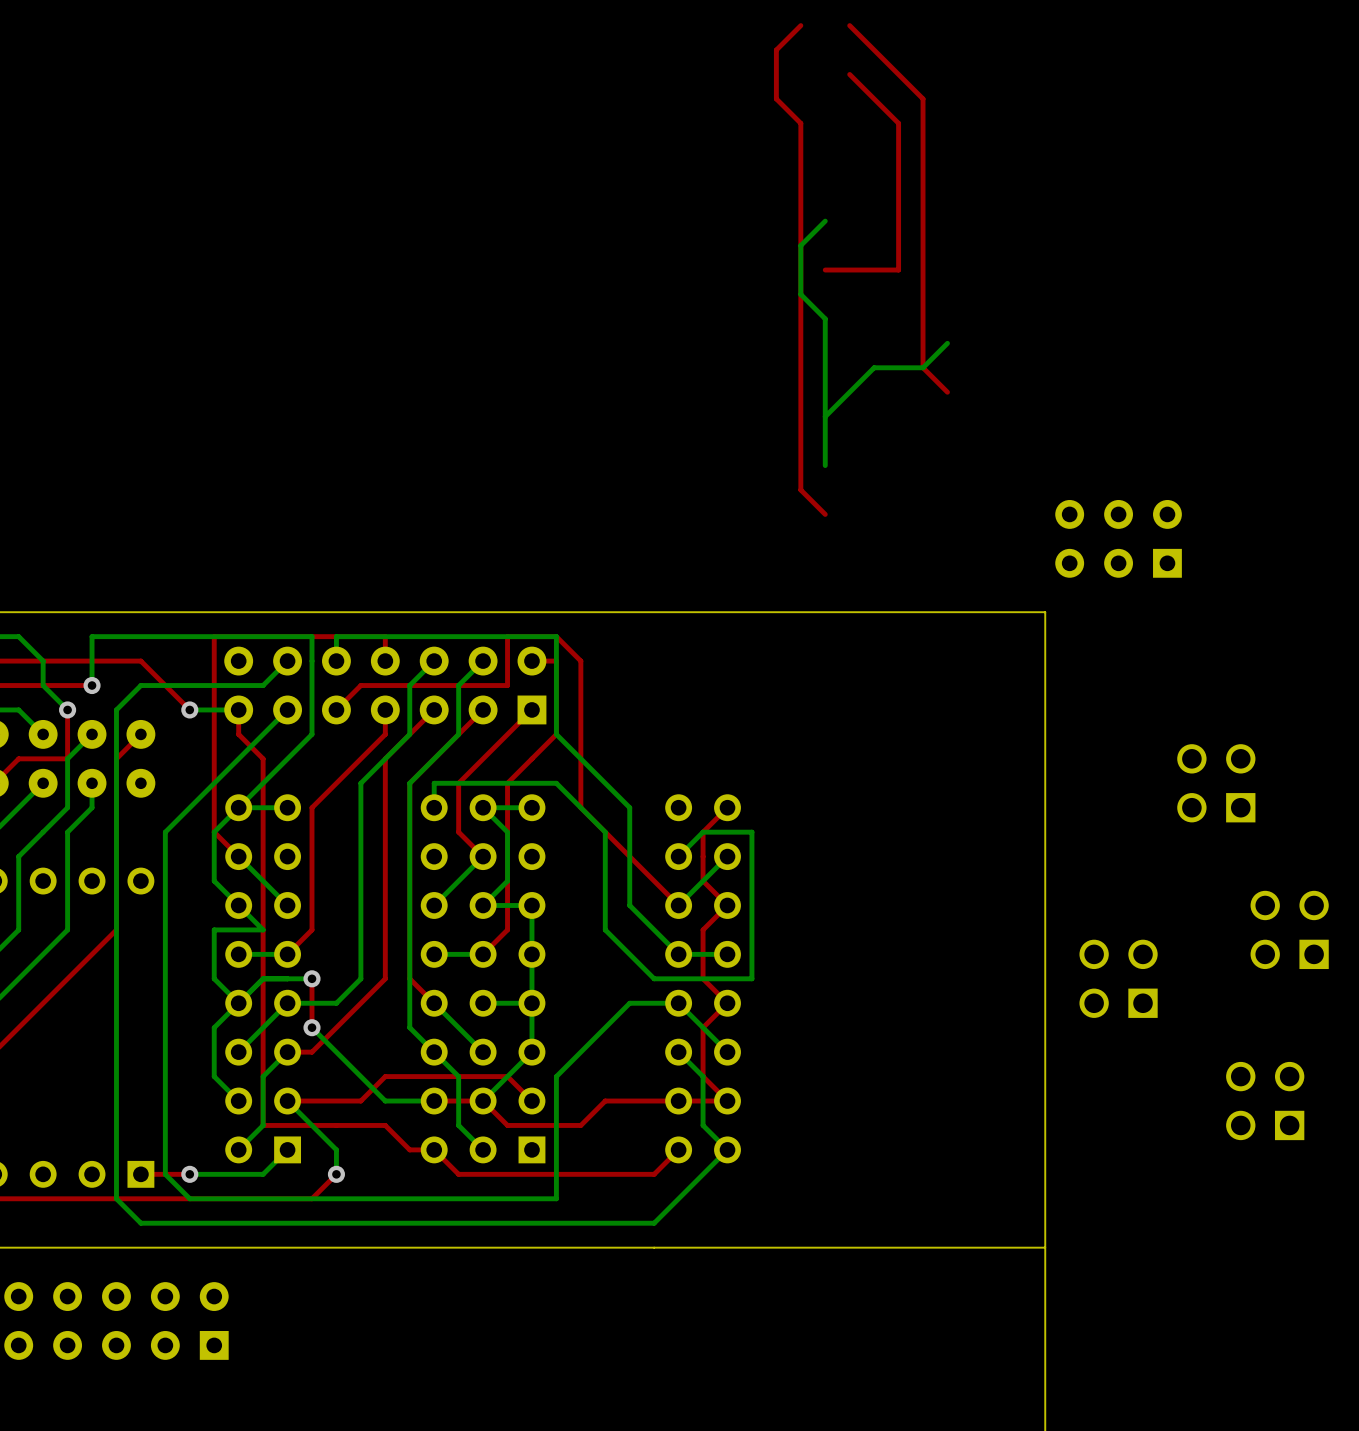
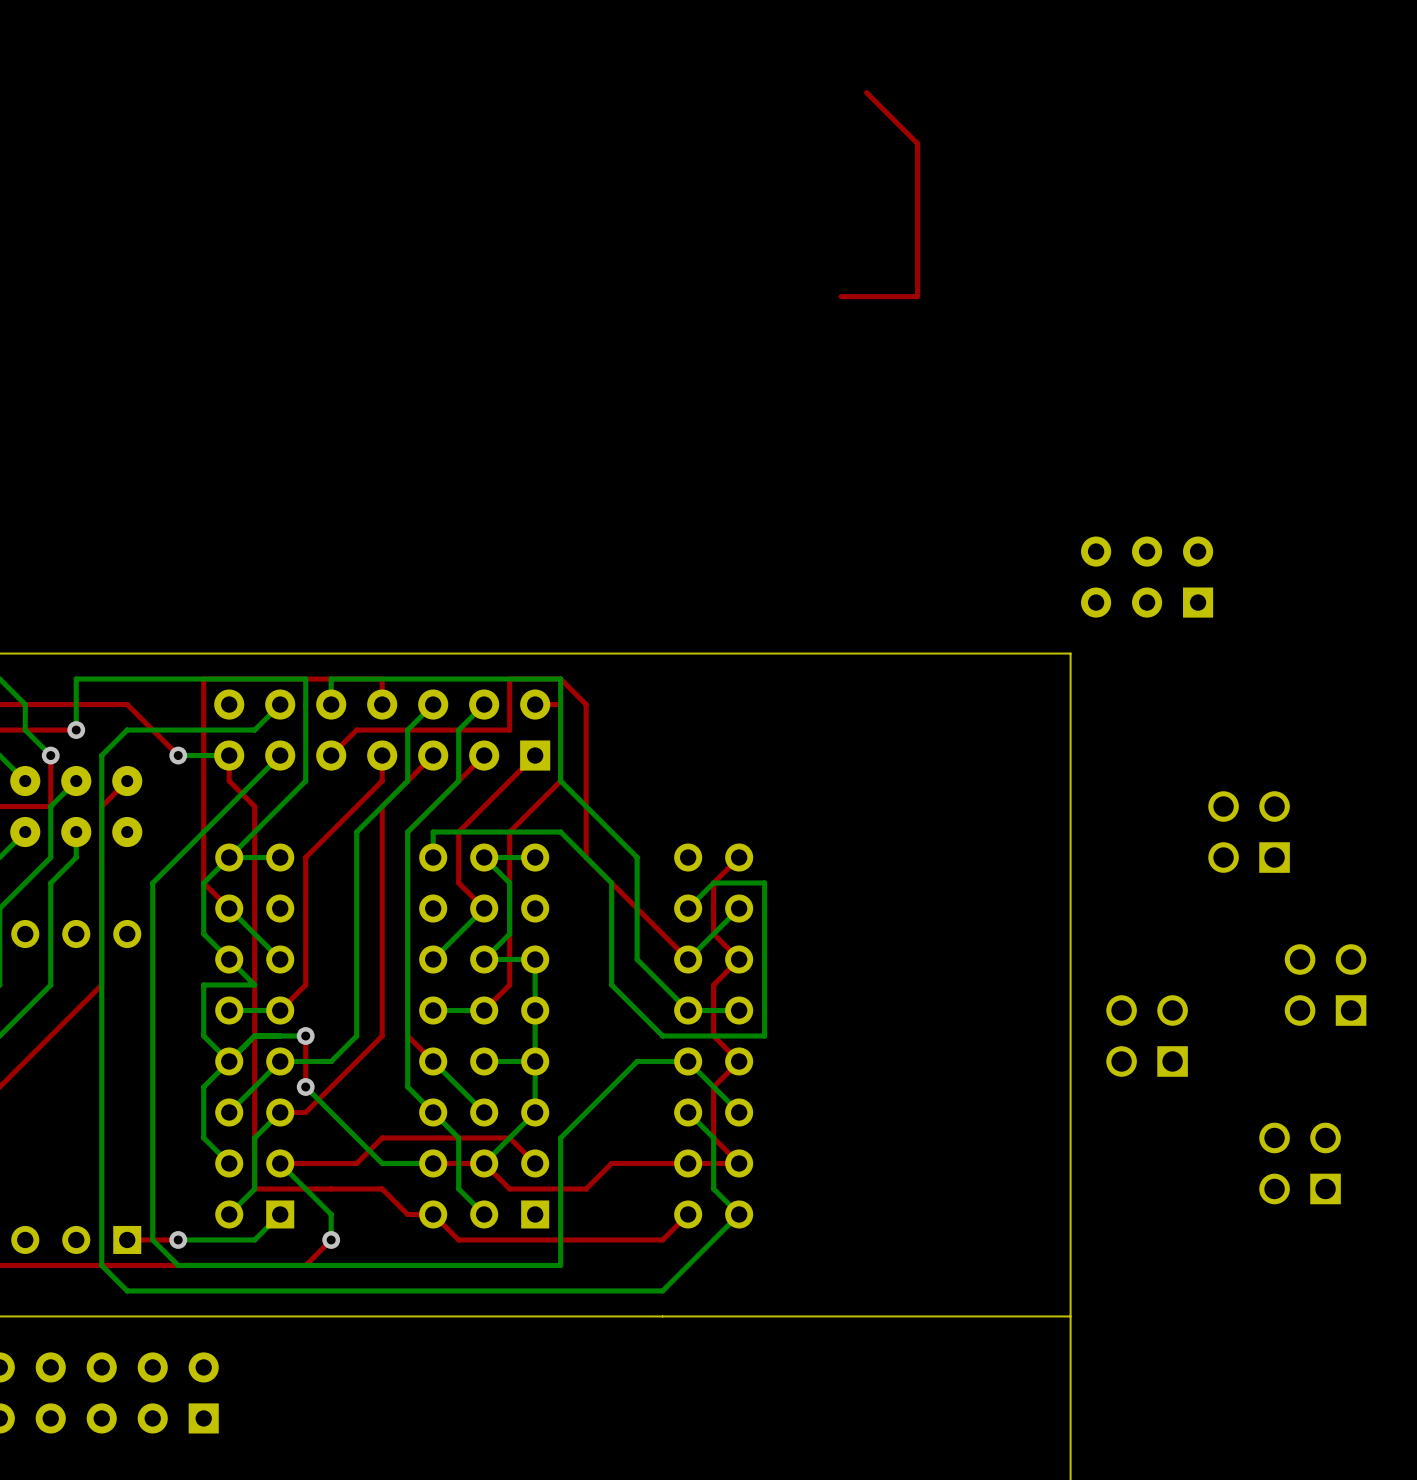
top track: (800, 25) (776, 50) (776, 98) (800, 123) (800, 489) (825, 514) -> none
top track: (849, 25) (923, 98) (923, 367) (947, 392) -> none
bottom track: (825, 221) (800, 245) (800, 294) (825, 318) (825, 465) -> none
bottom track: (947, 343) (923, 367) (874, 367) (825, 416) -> none

